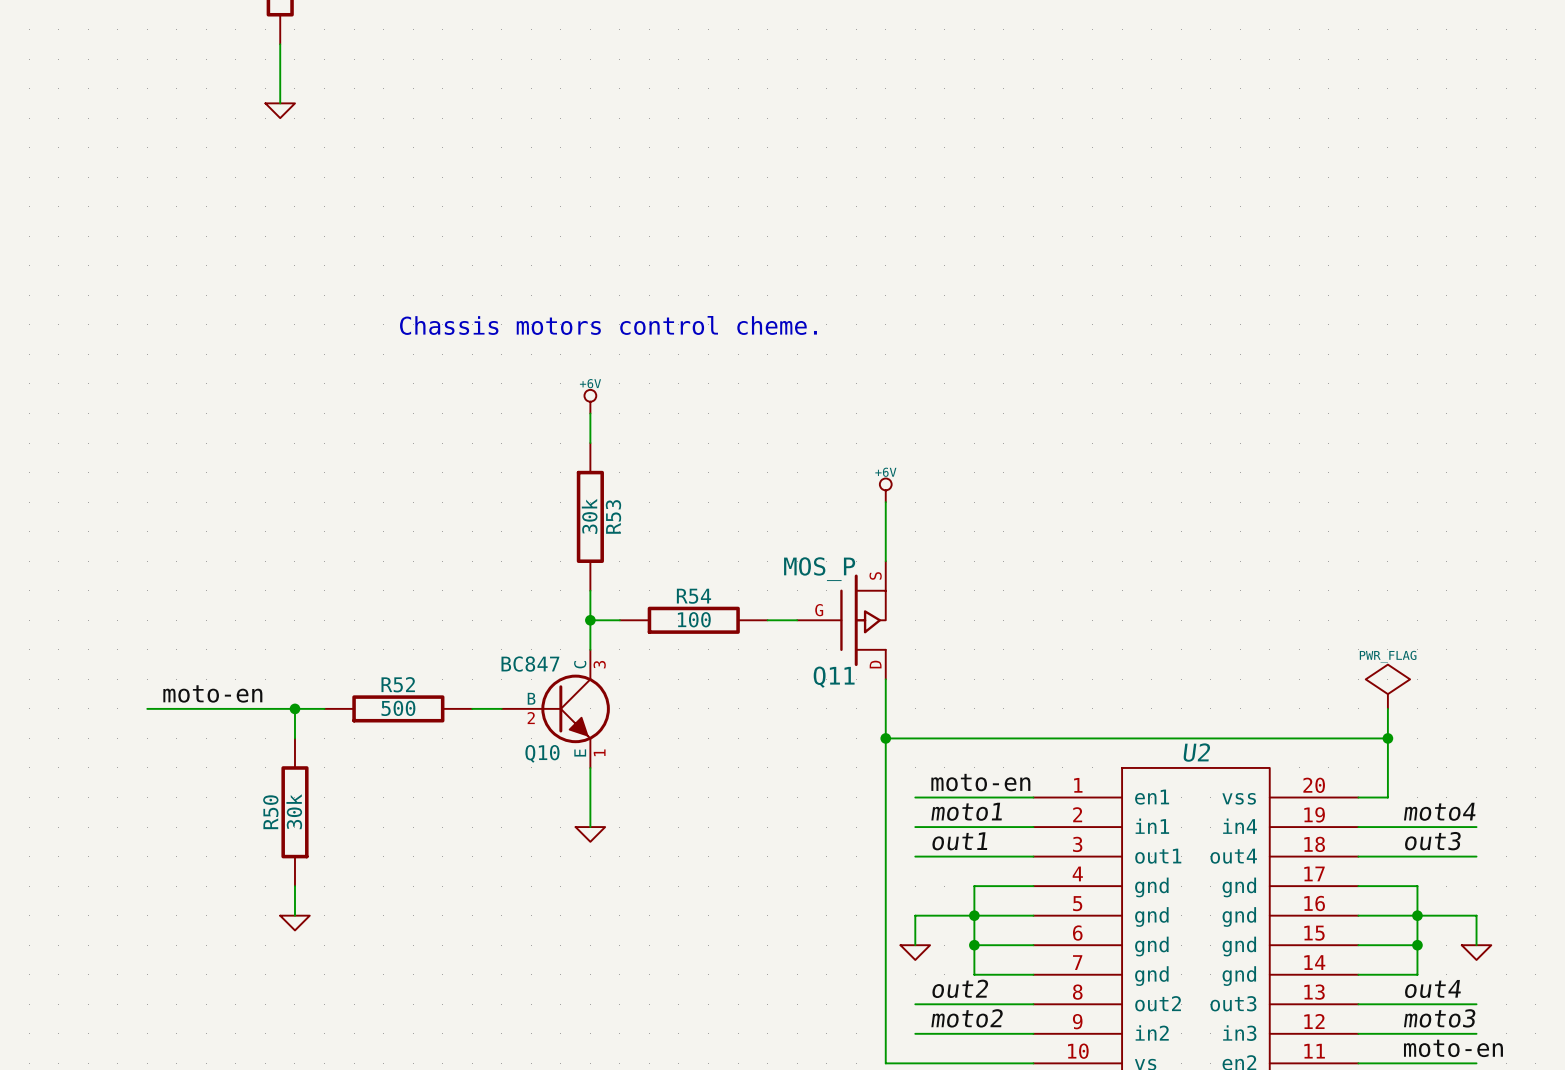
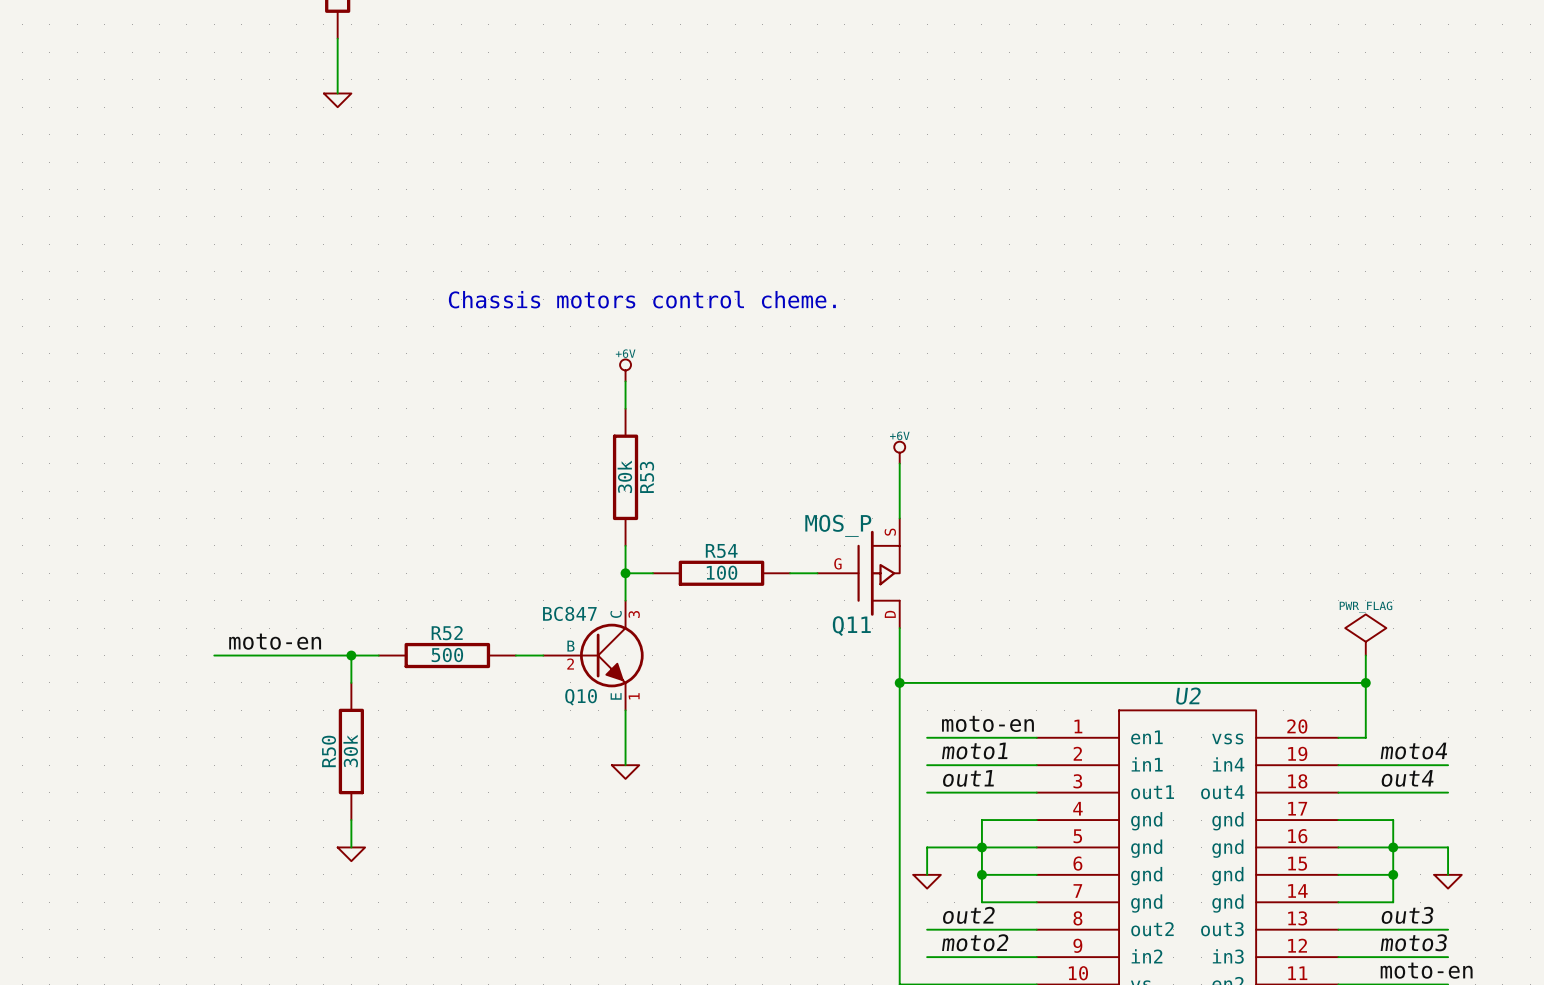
label: out3 (1432, 841) -> out4 (1407, 778)
label: out4 (1432, 989) -> out3 (1407, 915)

